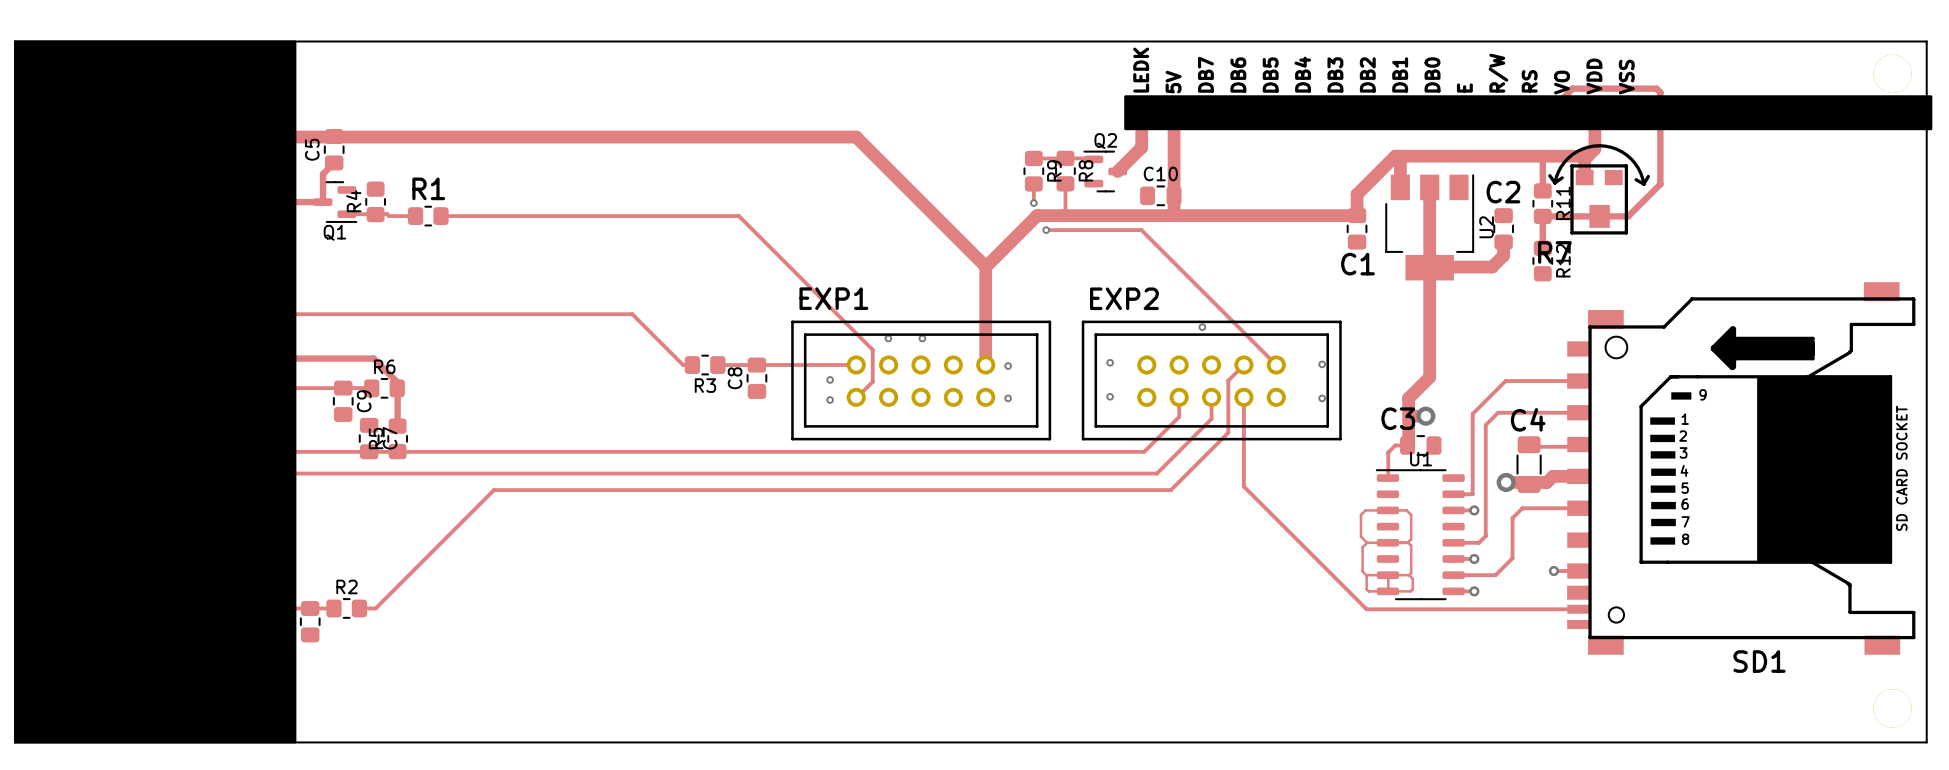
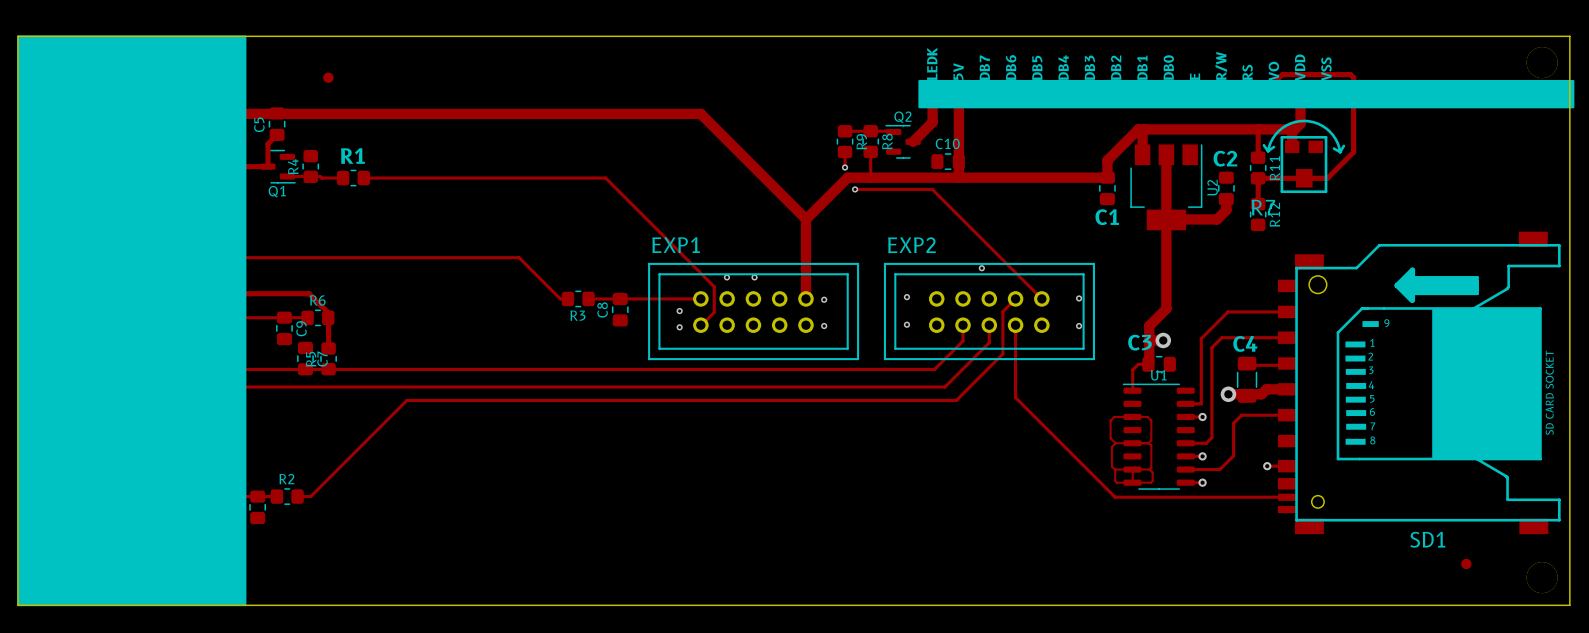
part: none -> (328, 77)
part: none -> (1466, 563)

